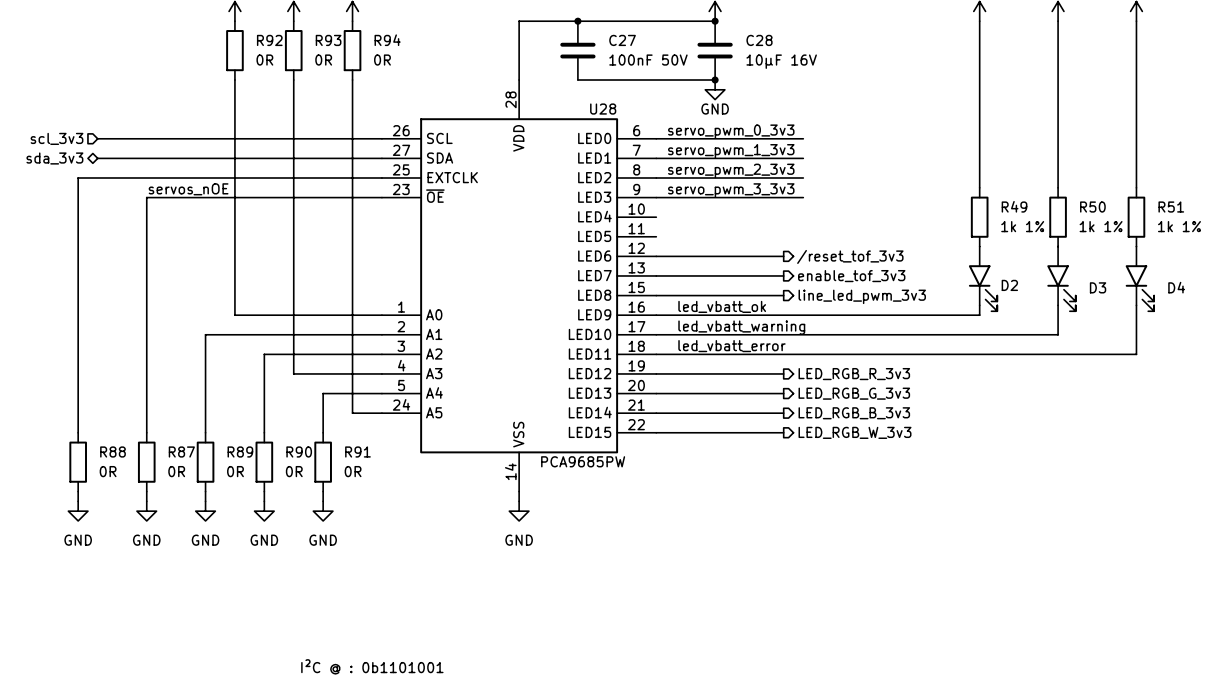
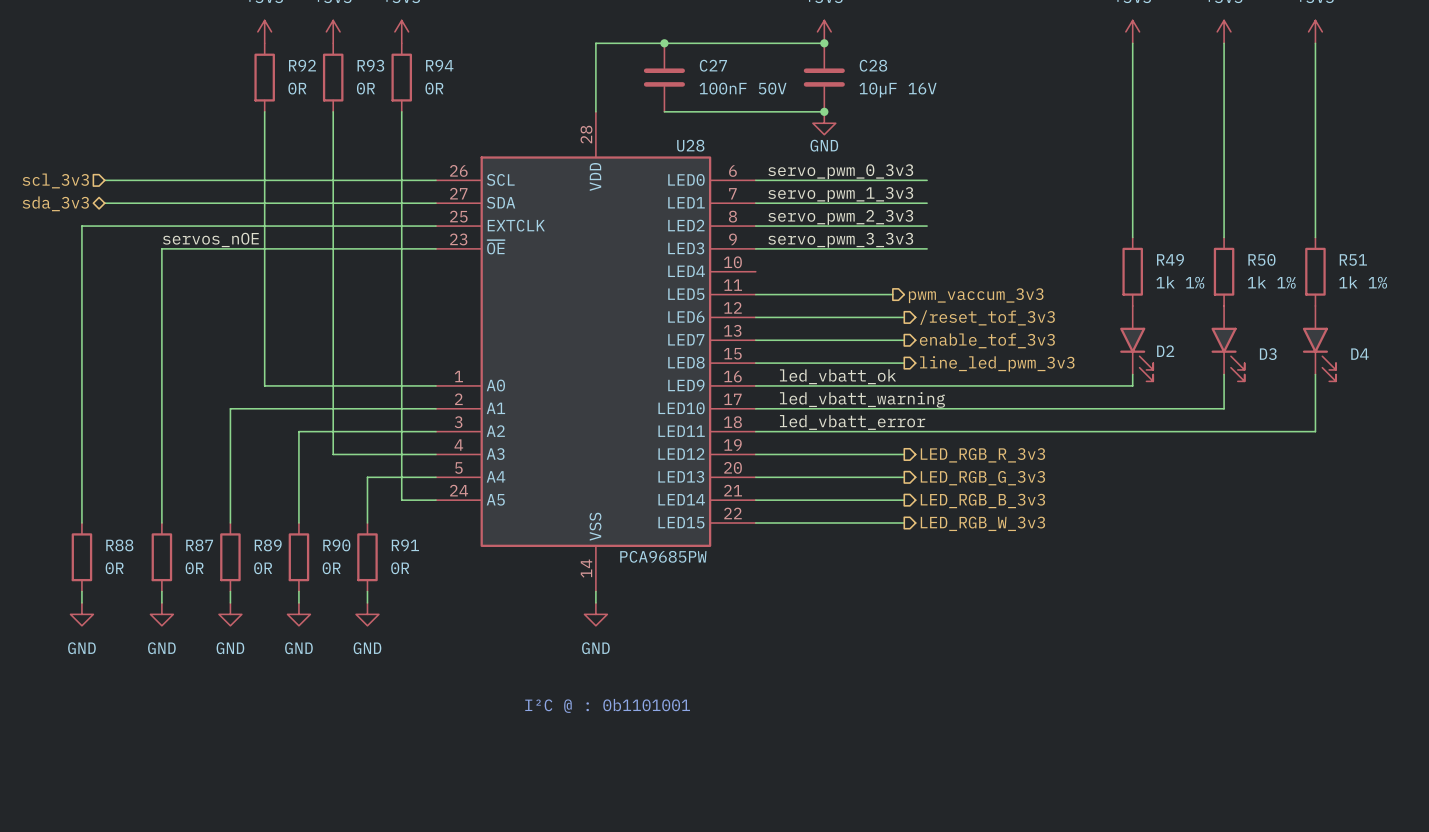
wire: none -> (755, 294) (892, 294)
hierarchical label: none -> pwm_vaccum_3v3 (976, 295)
text position: I²C @ : 0b1101001 (372, 666) -> I²C @ : 0b1101001 (607, 705)

